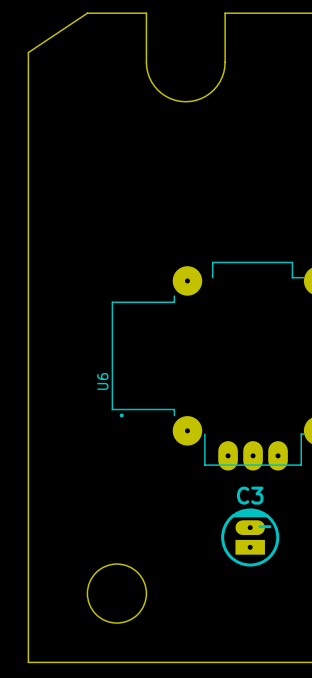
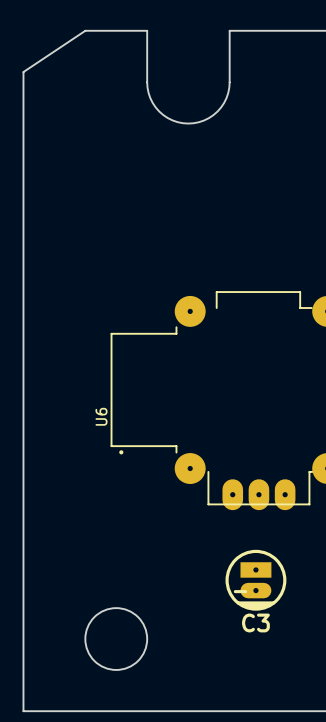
C3 rotation: 0° (250, 537) -> 180° (255, 580)

